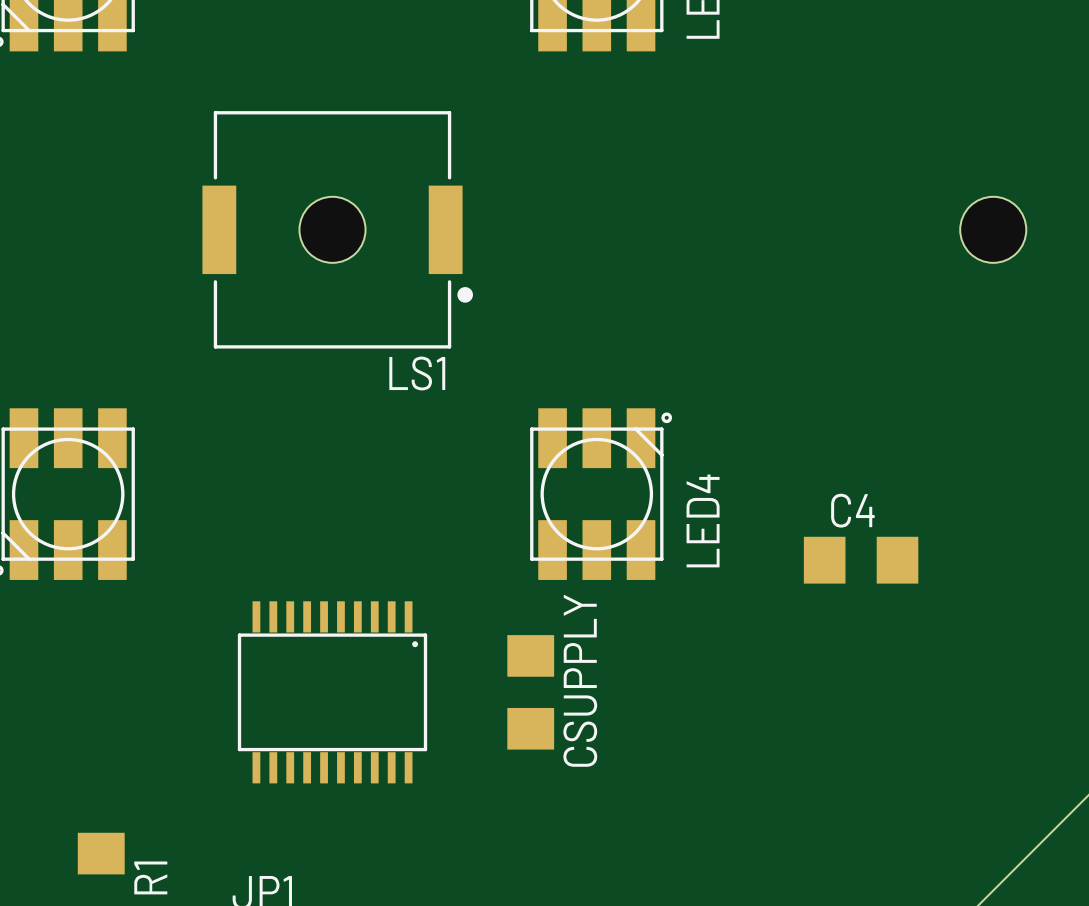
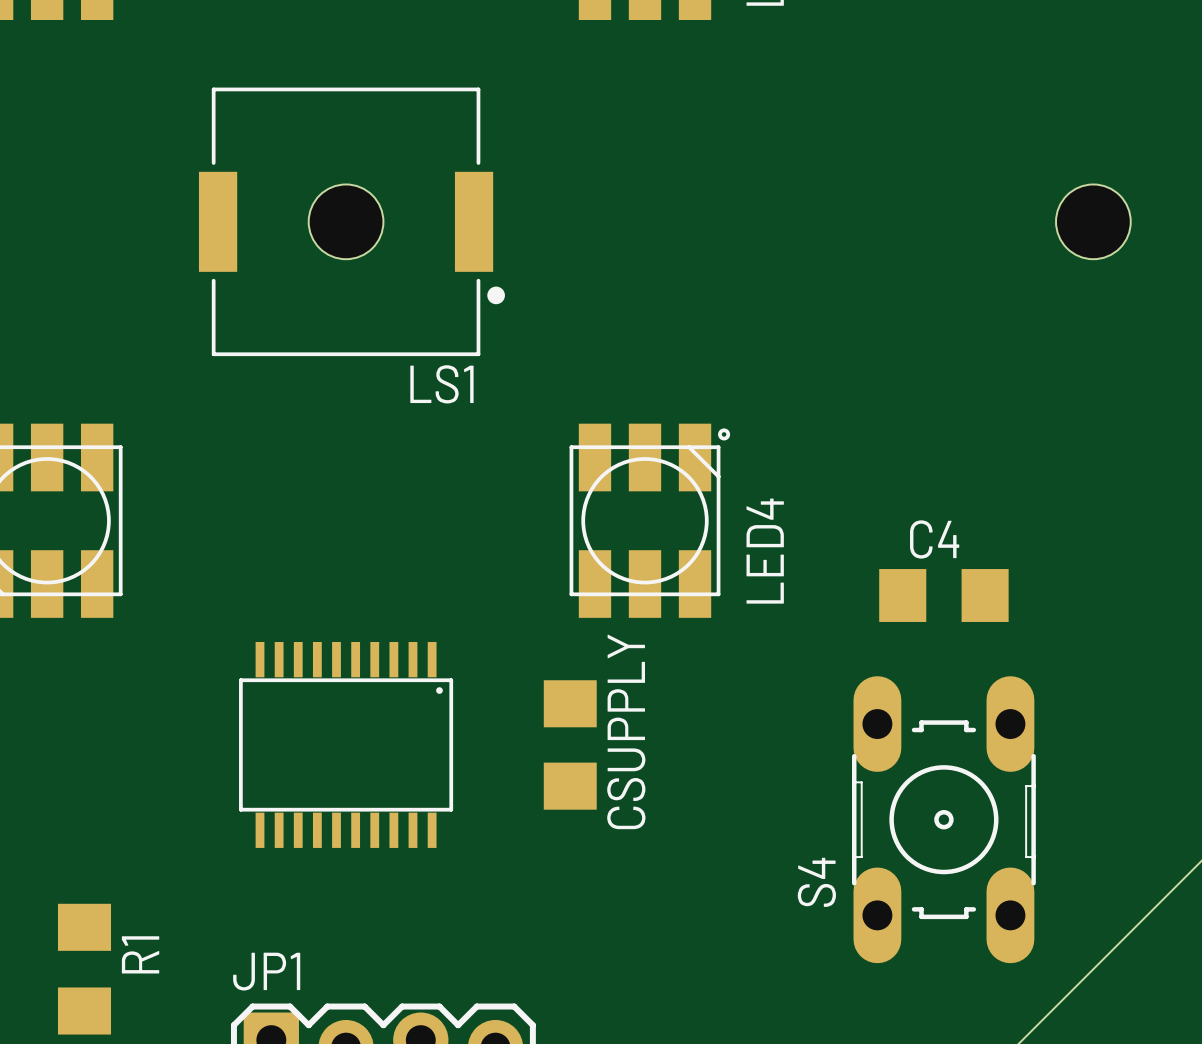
S4: none -> (943, 819)

